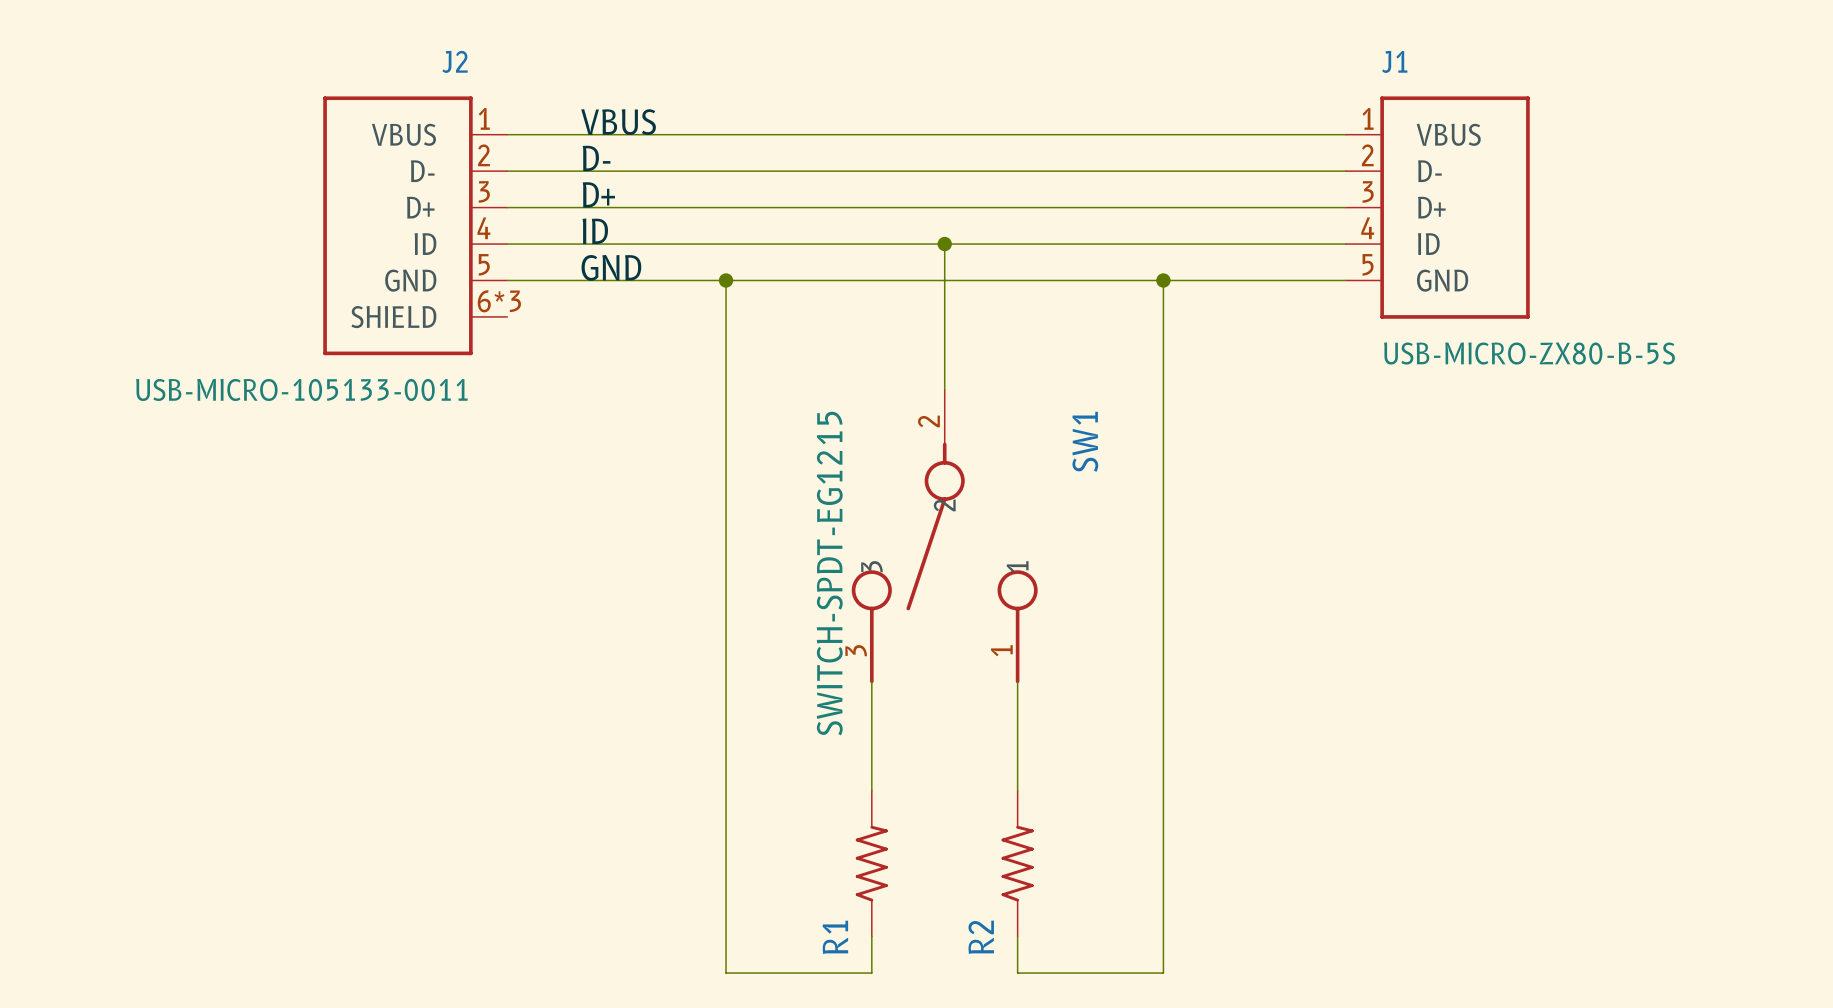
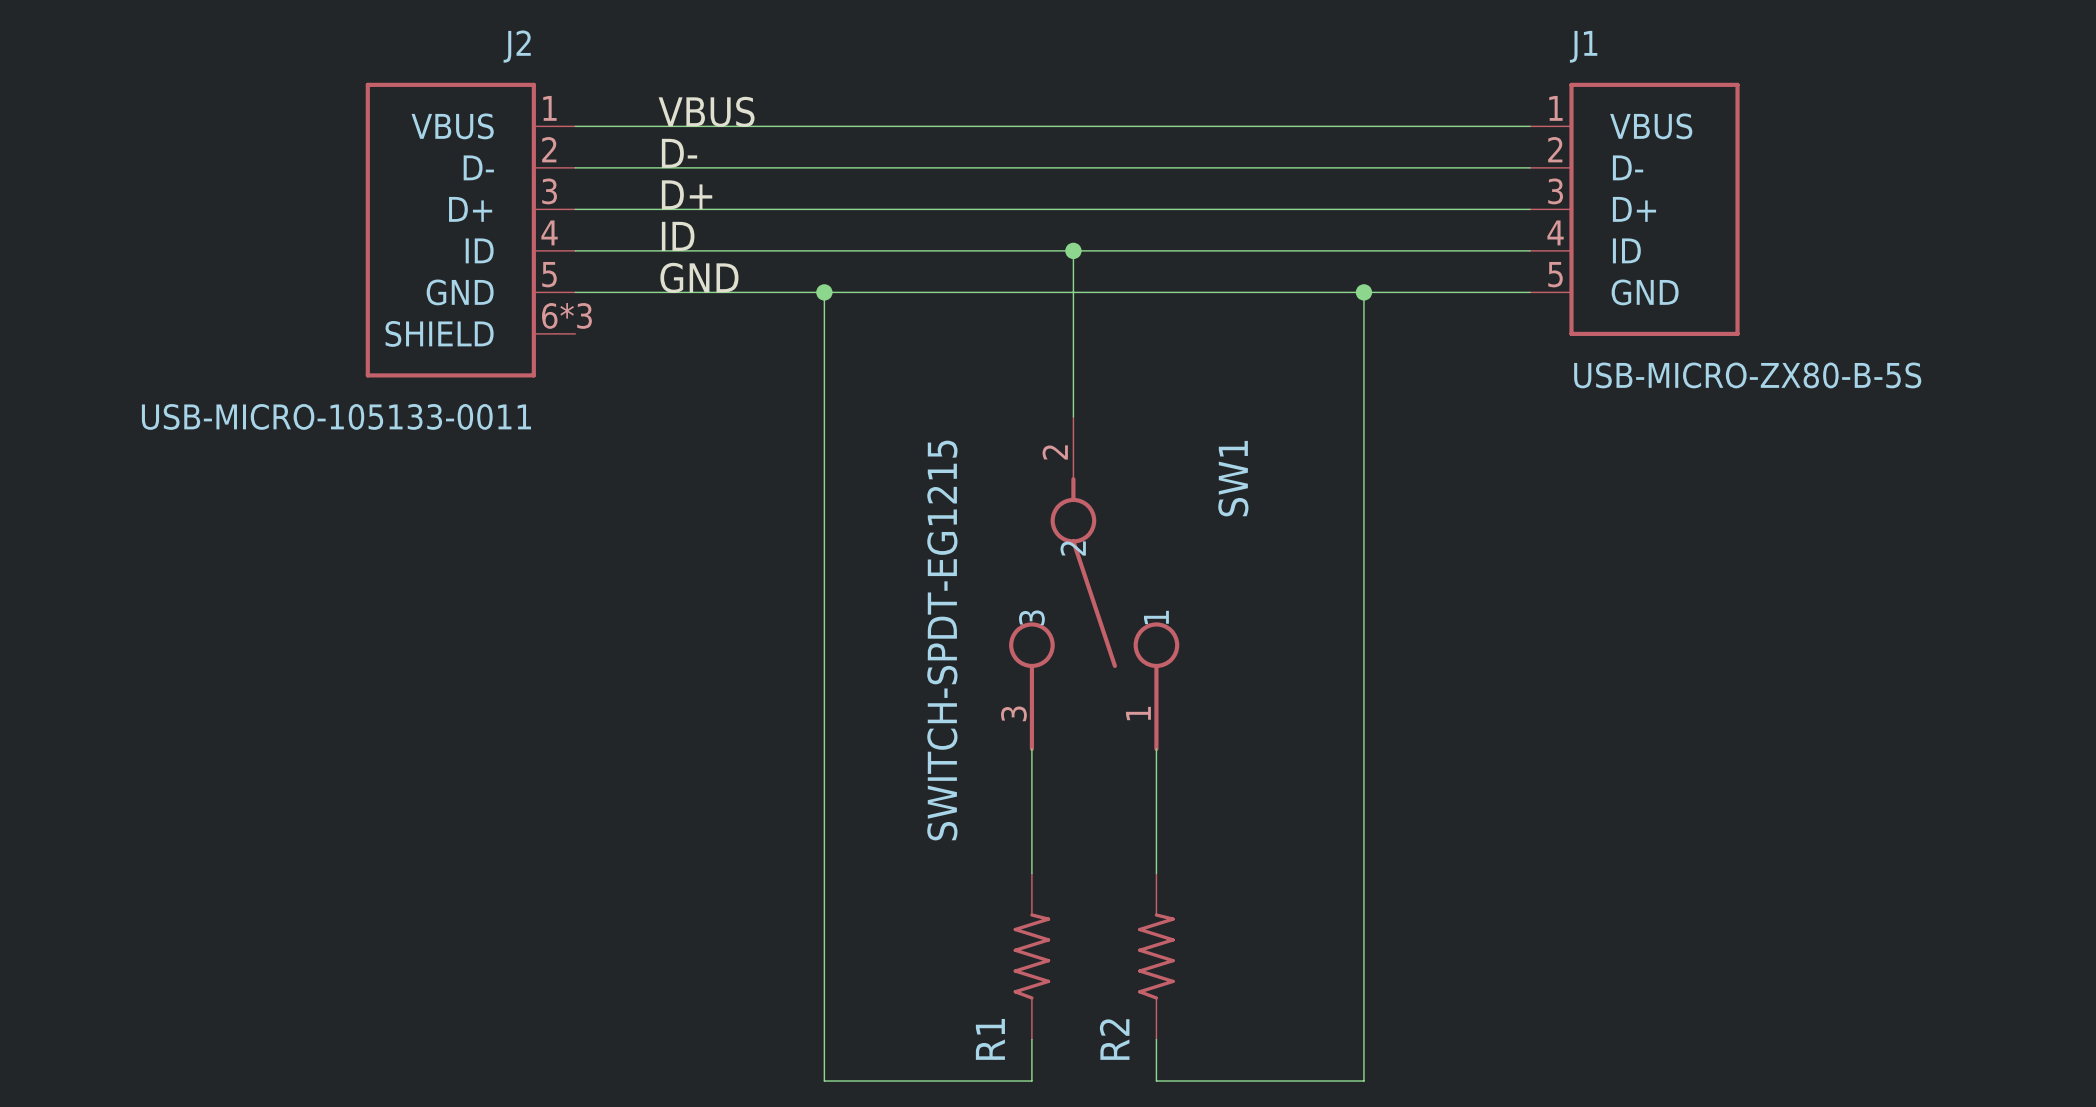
wire: (1163, 280) (1163, 973) -> (1363, 292) (1363, 1081) (1322, 1081)
junction position: (1163, 280) -> (1363, 292)
SW1 symbol: [851, 389, 1038, 684] -> [1009, 416, 1180, 752]
wire: (871, 681) (871, 790) -> (1031, 748) (1031, 873)
R1 position: (871, 863) -> (1031, 956)
wire: (871, 936) (871, 973) -> (1031, 1039) (1031, 1081) (990, 1081)

